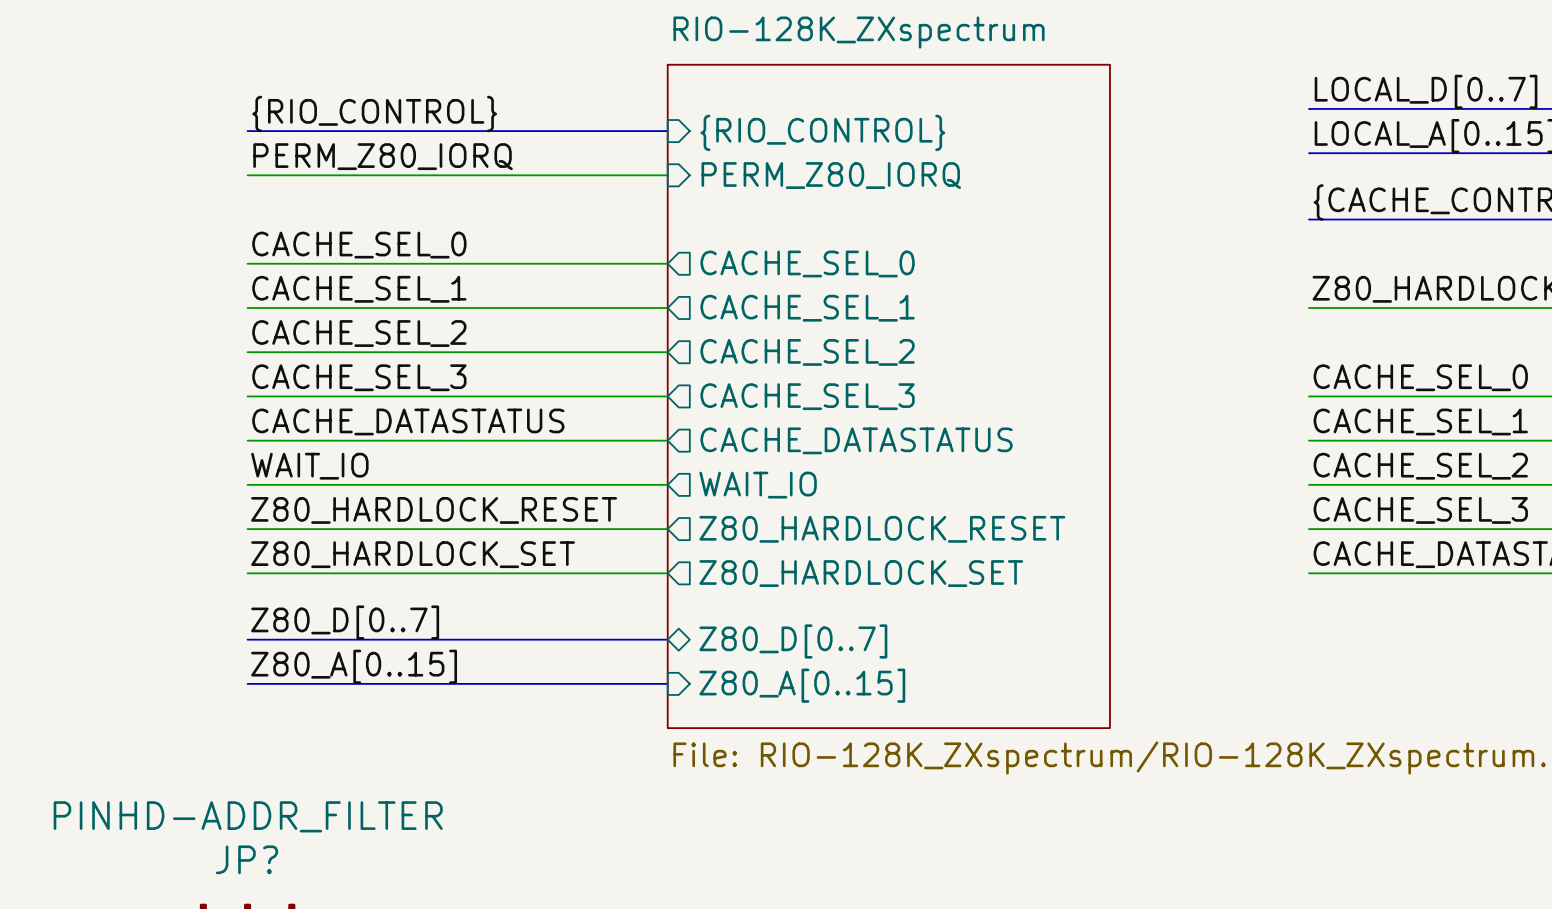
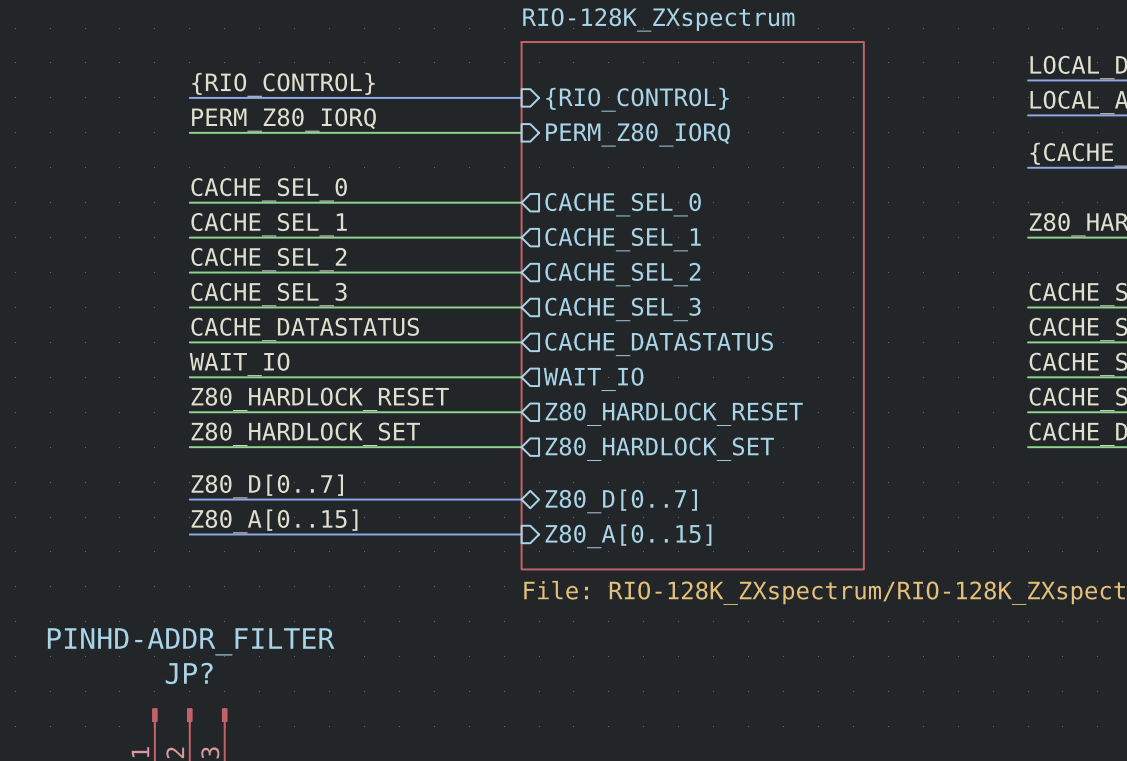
sheet RIO-128K_ZXspectrum shape: [667, 64, 1110, 729] -> [521, 42, 864, 570]

